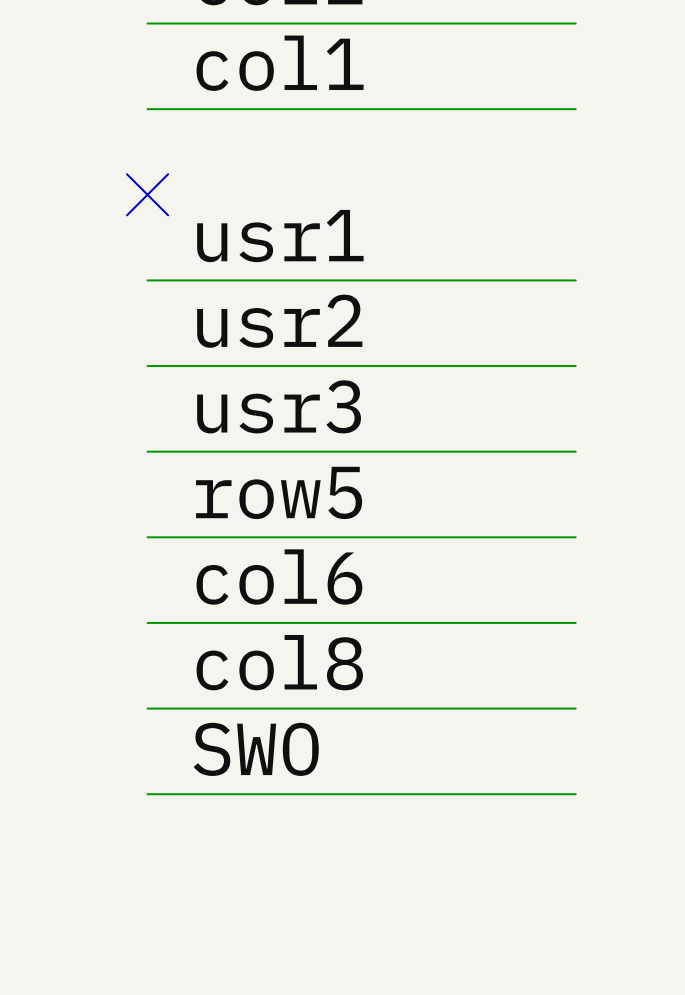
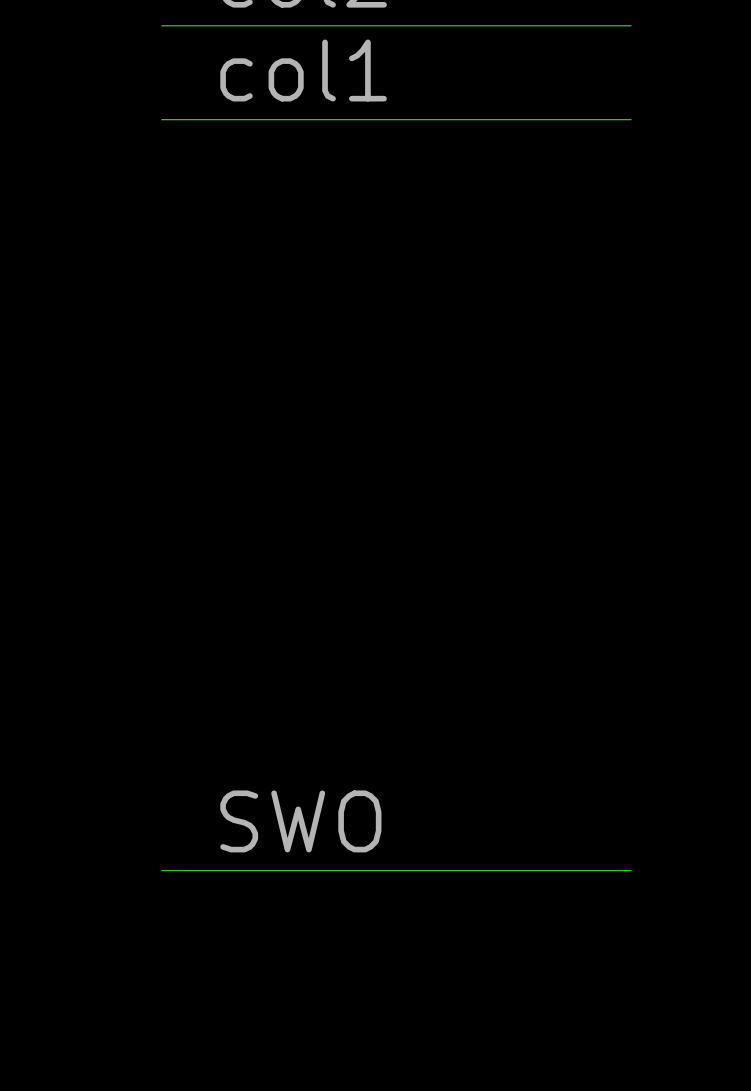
no-connect mark: (147, 194) -> none
label: usr1 (280, 236) -> none
wire: (147, 280) (575, 280) -> none
label: usr2 (279, 321) -> none
wire: (147, 366) (575, 366) -> none
label: usr3 (279, 406) -> none
wire: (147, 451) (575, 451) -> none
label: row5 (279, 492) -> none
wire: (147, 537) (575, 537) -> none
label: col6 (279, 577) -> none
wire: (147, 622) (575, 622) -> none
label: col8 (279, 662) -> none
wire: (147, 708) (575, 708) -> none

